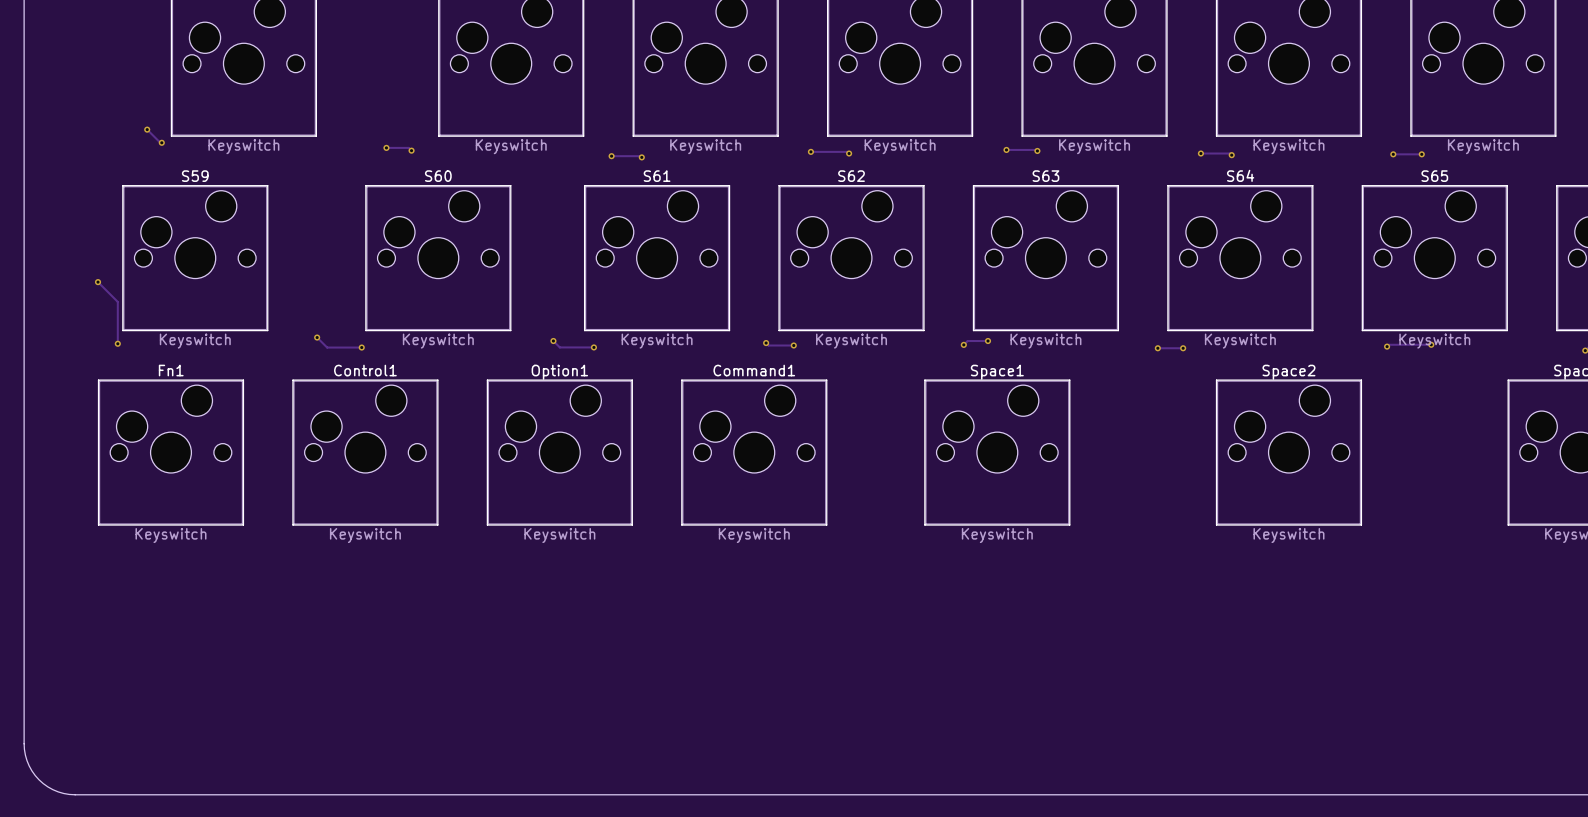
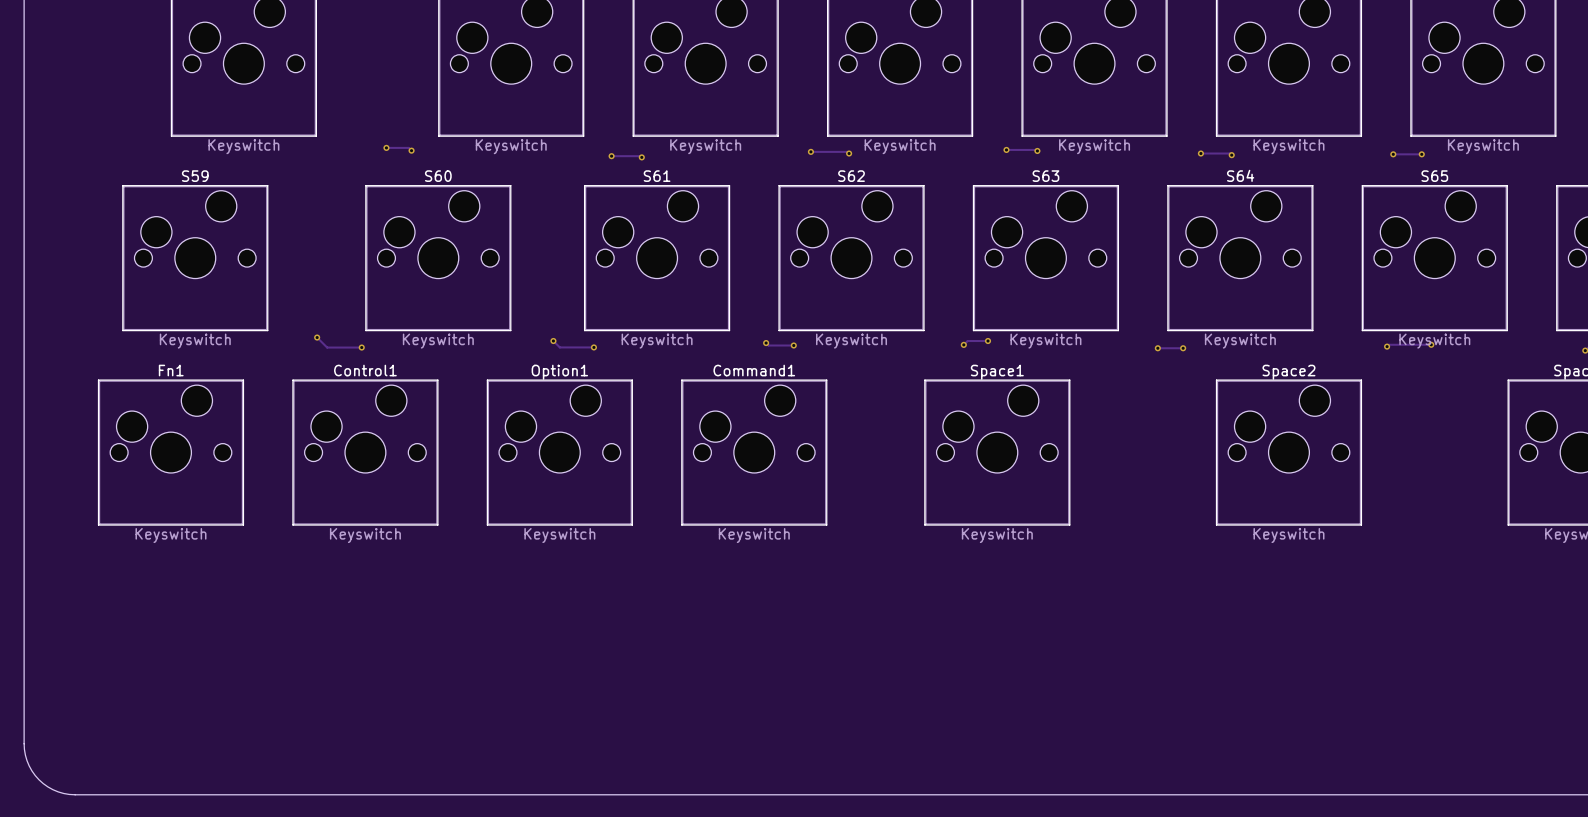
track: (147, 129) (161, 142) -> none
via: (147, 129) -> none
via: (161, 142) -> none
track: (98, 282) (117, 301) (117, 343) -> none
via: (98, 282) -> none
via: (117, 343) -> none

